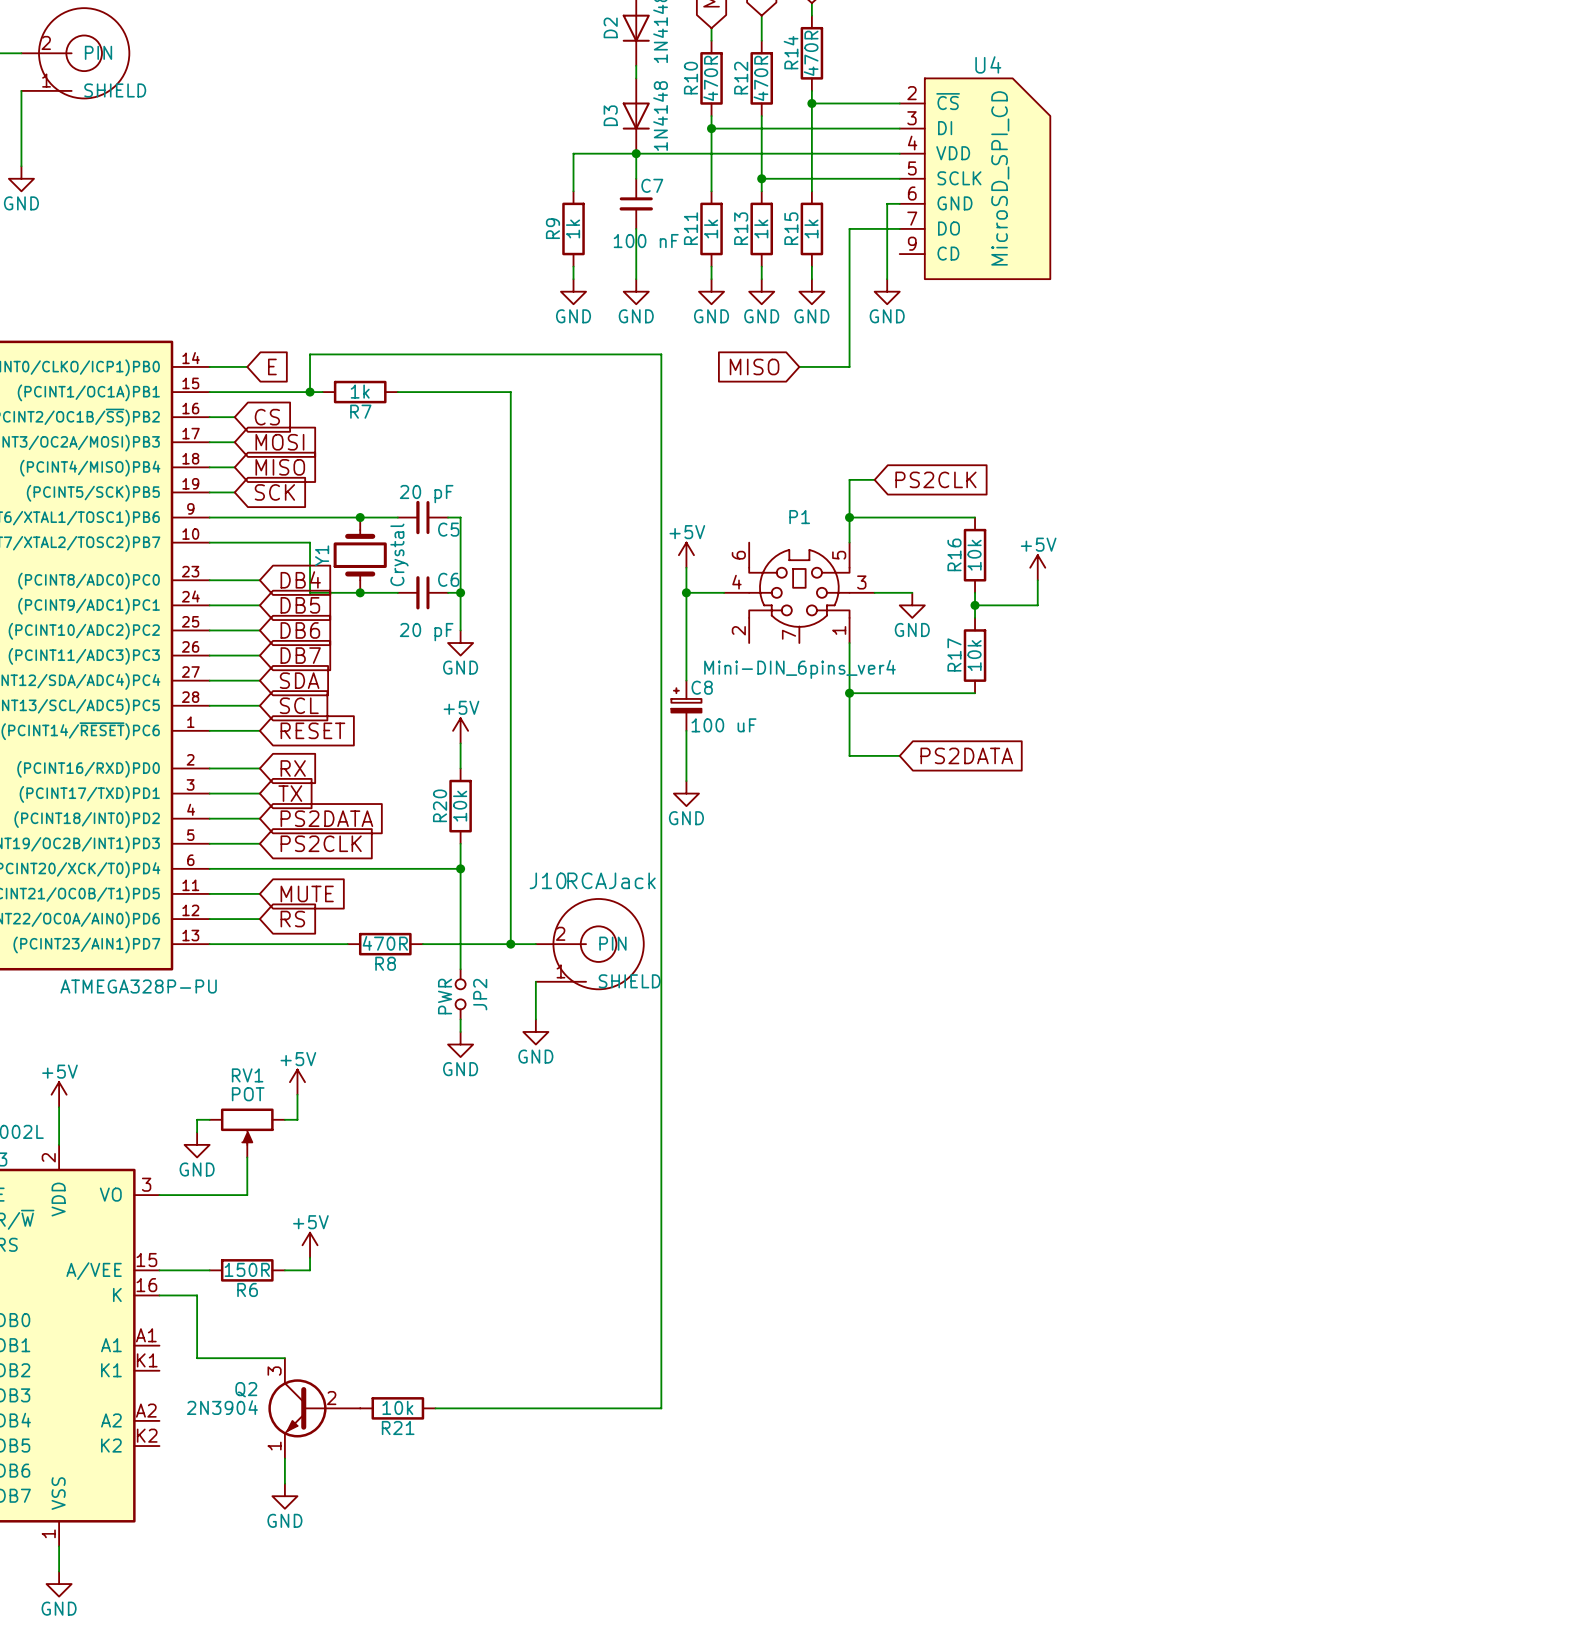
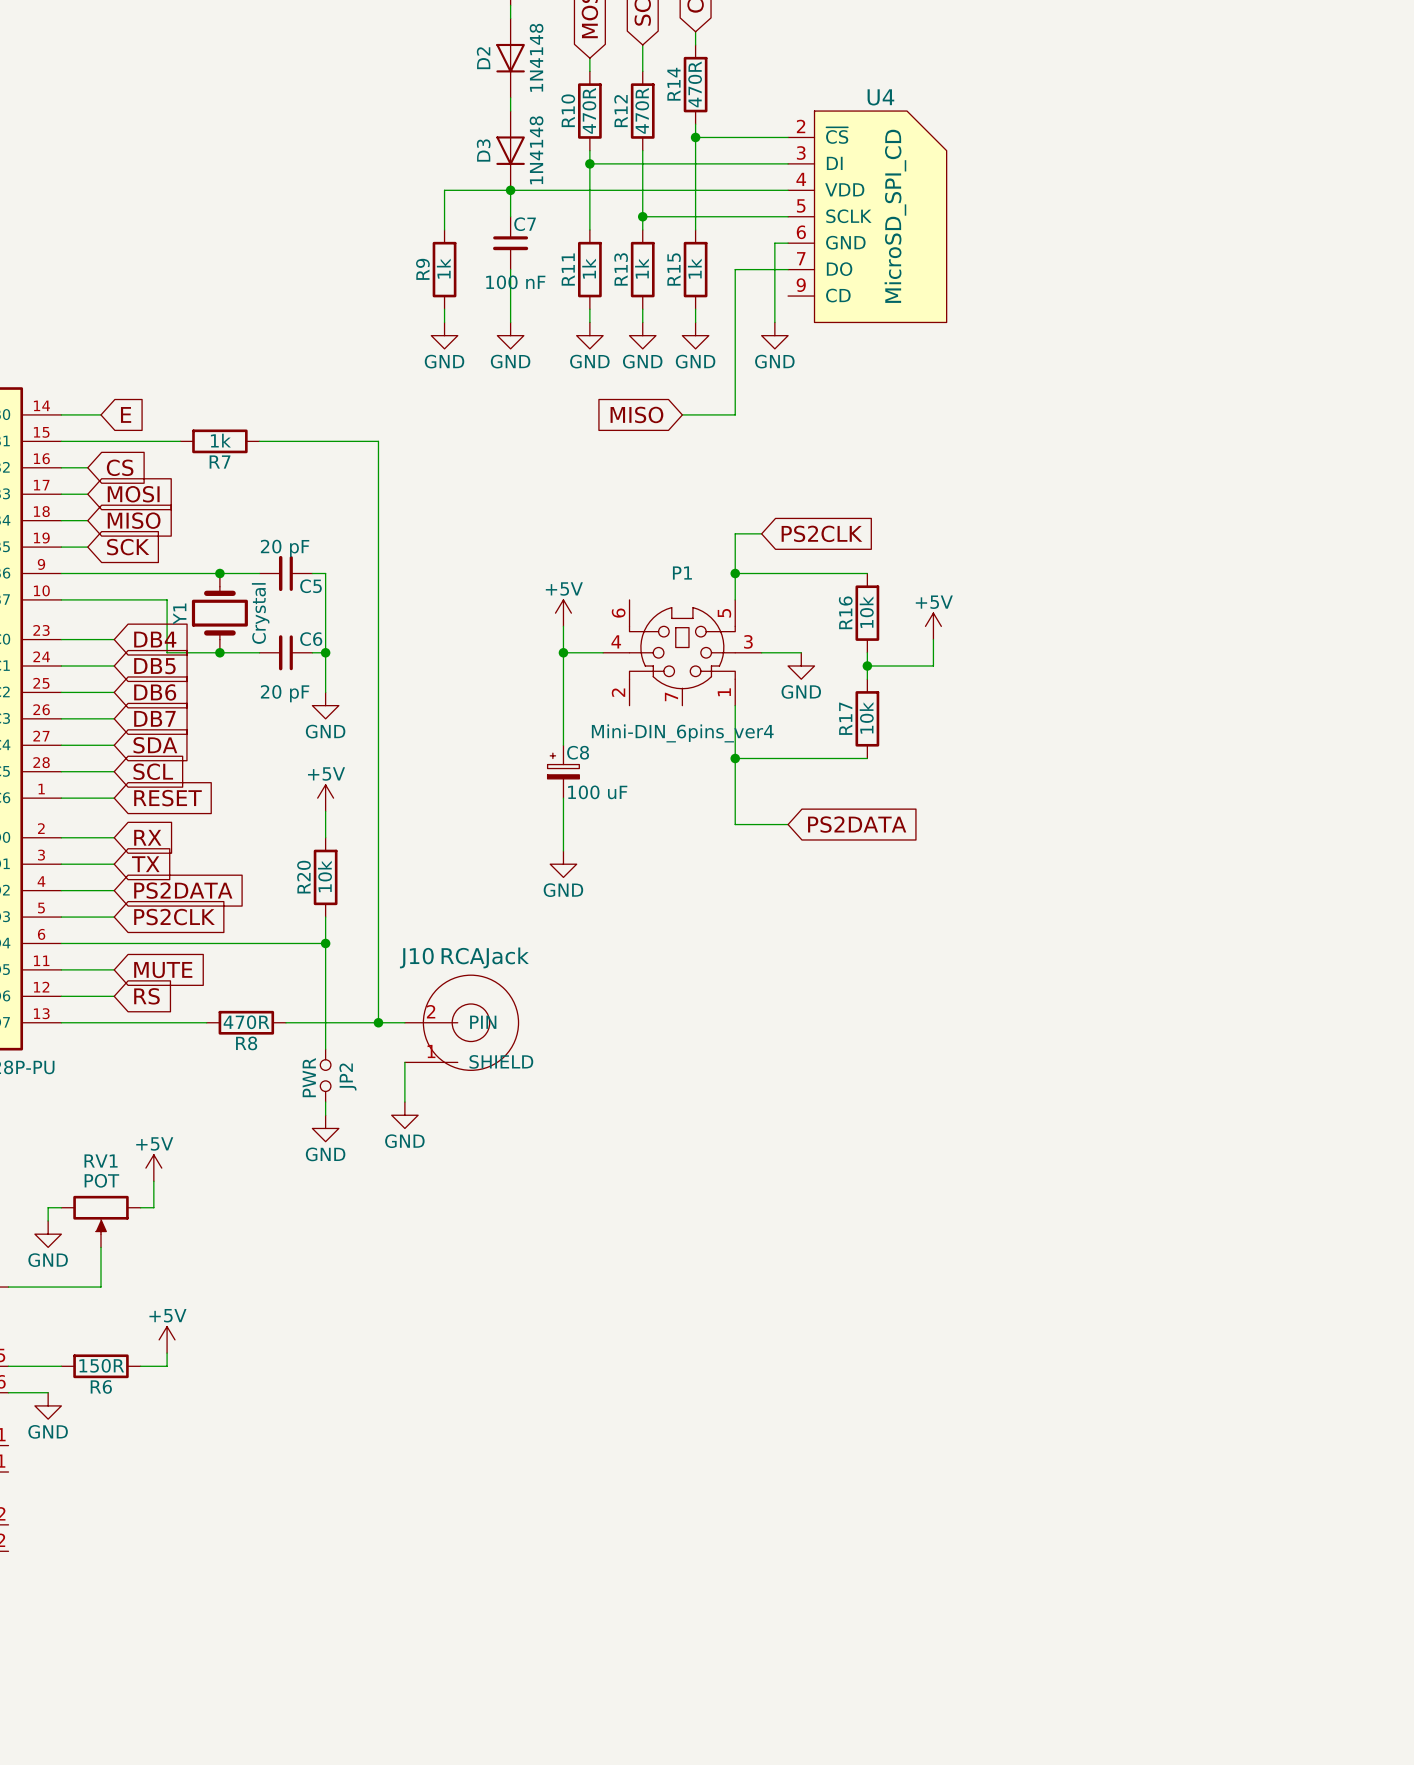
wire: (310, 392) (310, 354) (661, 354) (661, 1408) (435, 1408) -> none
junction: (310, 392) -> none
wire: (197, 1295) (197, 1358) (284, 1358) -> none
Q2: 2N3904 (314, 1408) -> none
R21: 10k (397, 1408) -> none
wire: (284, 1458) (284, 1483) -> none
power symbol position: GND (284, 1496) -> GND (48, 1405)

